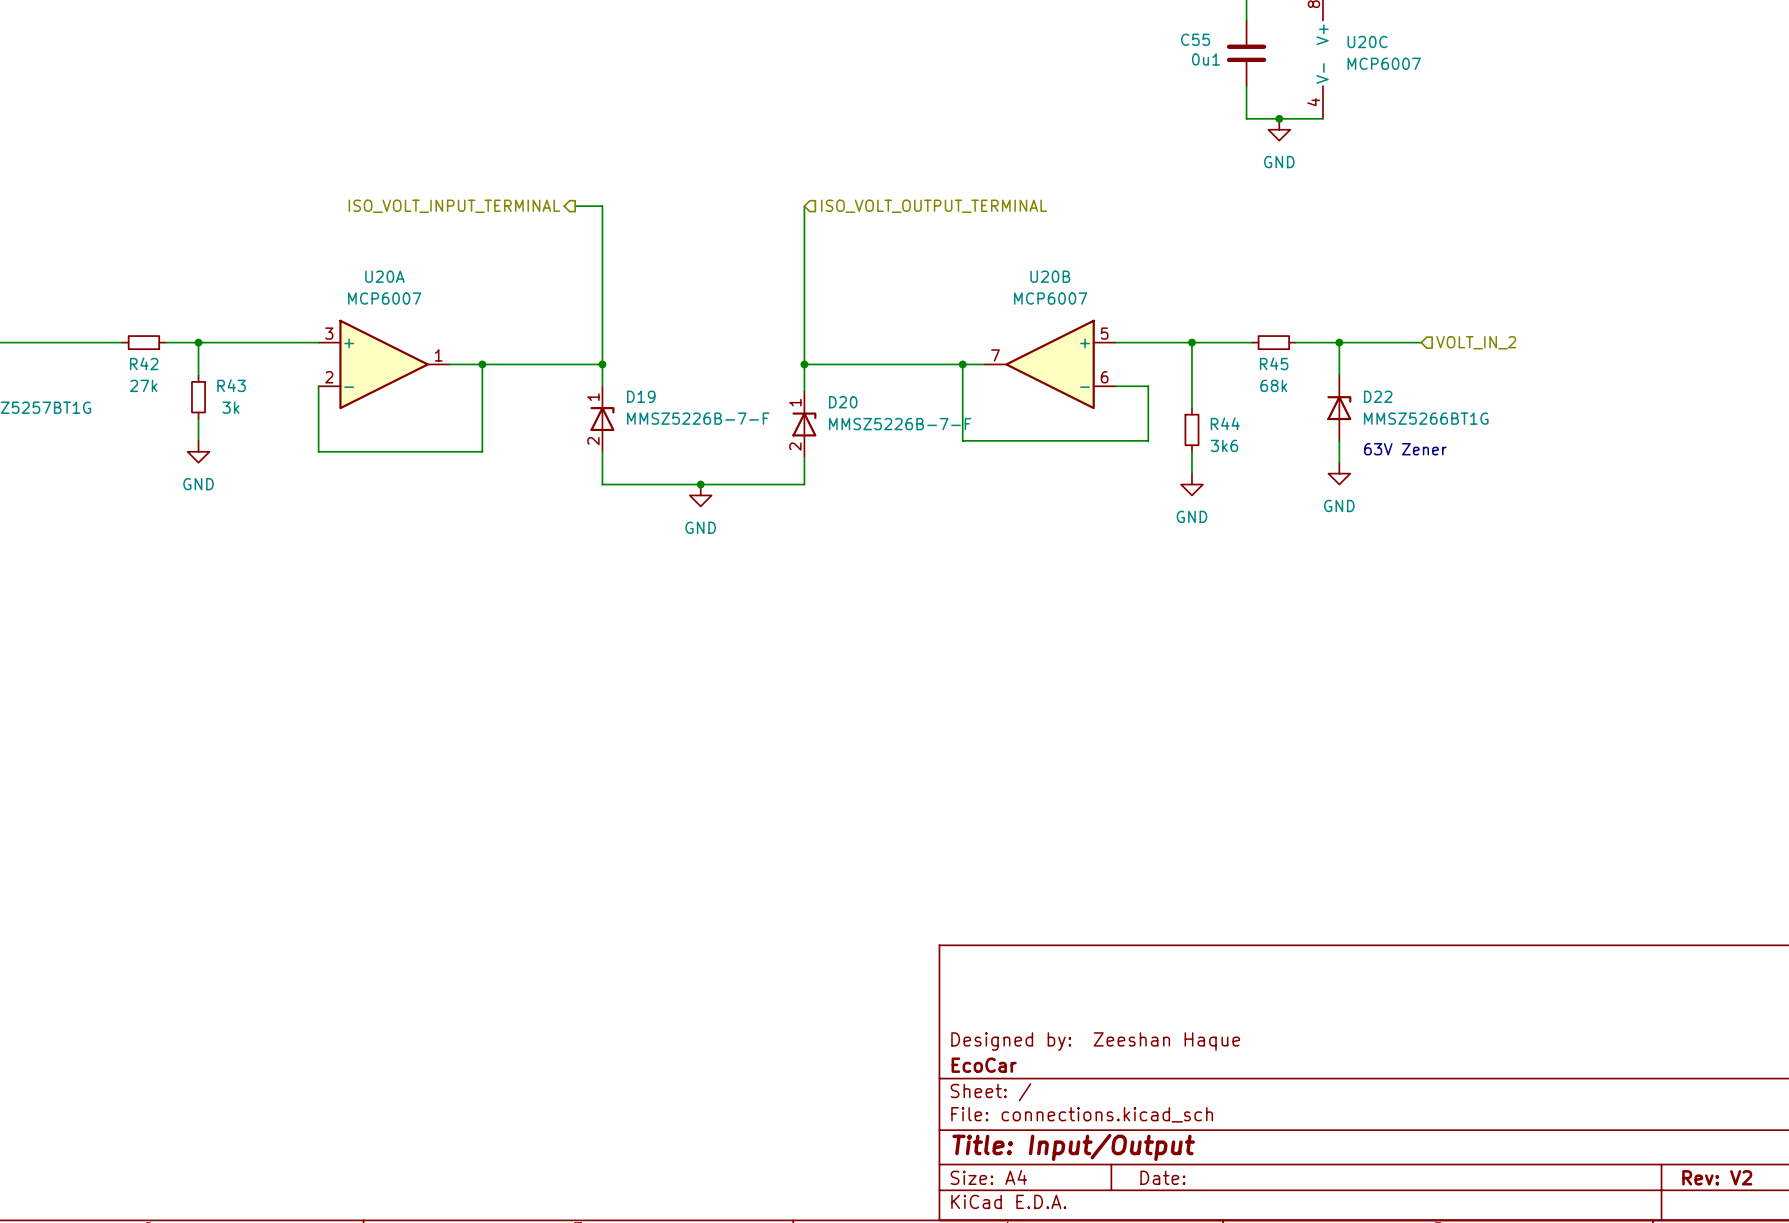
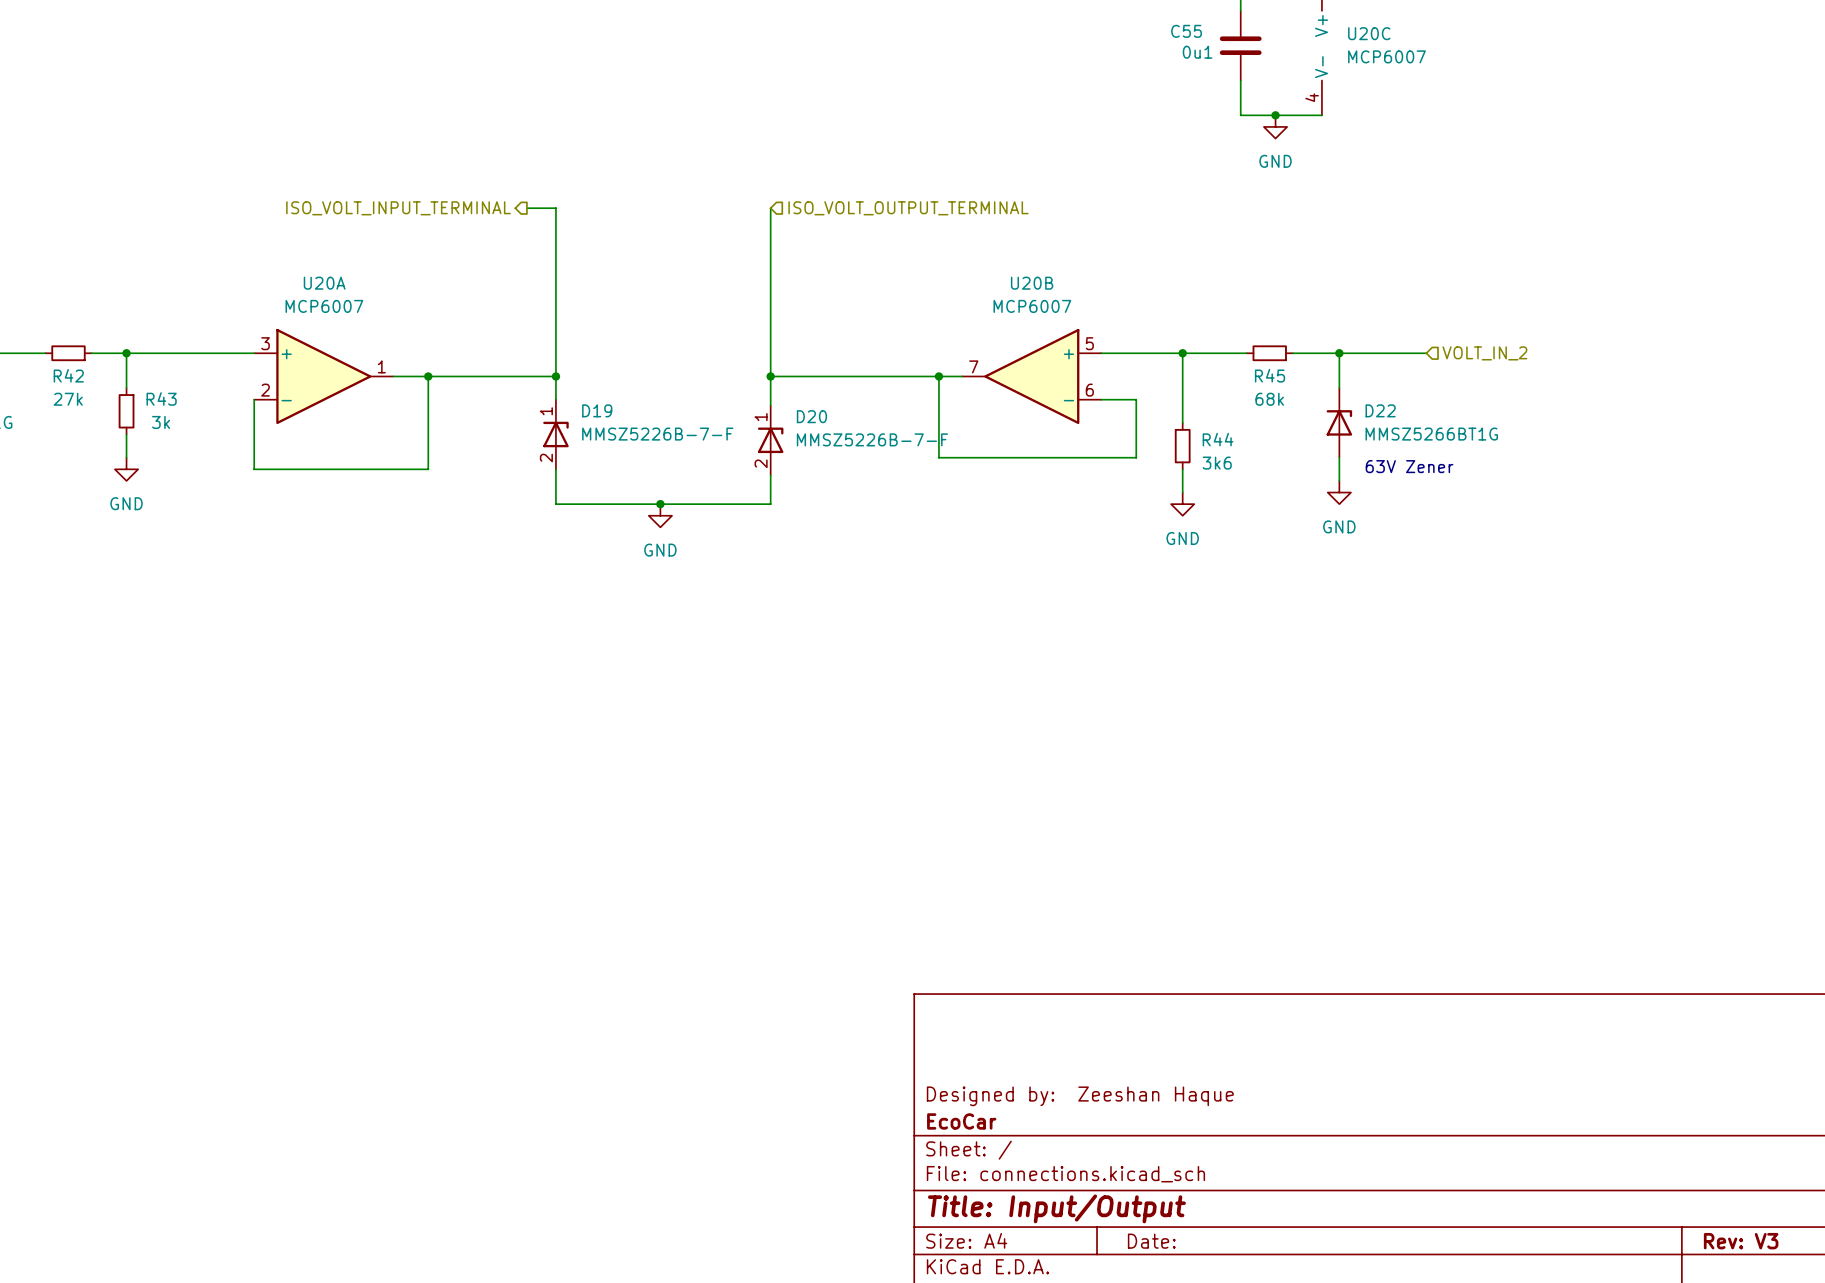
title block: Rev: V2 (1717, 1177) -> Rev: V3 (1741, 1241)

